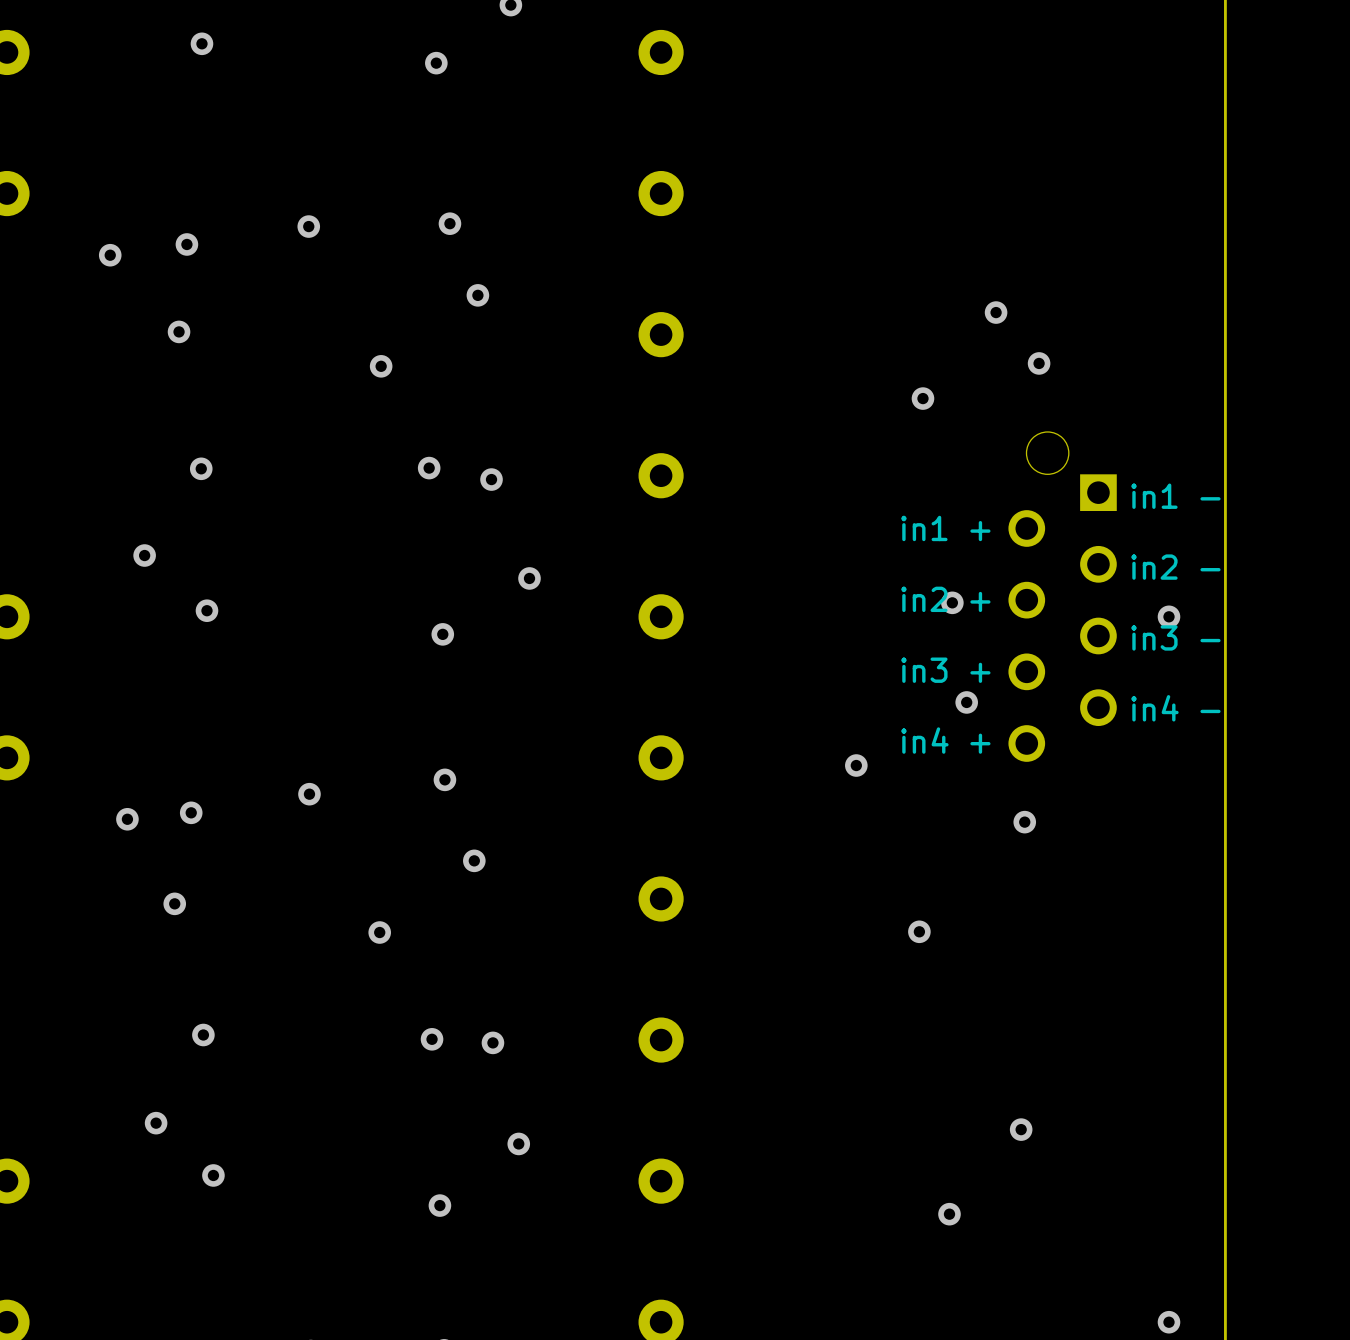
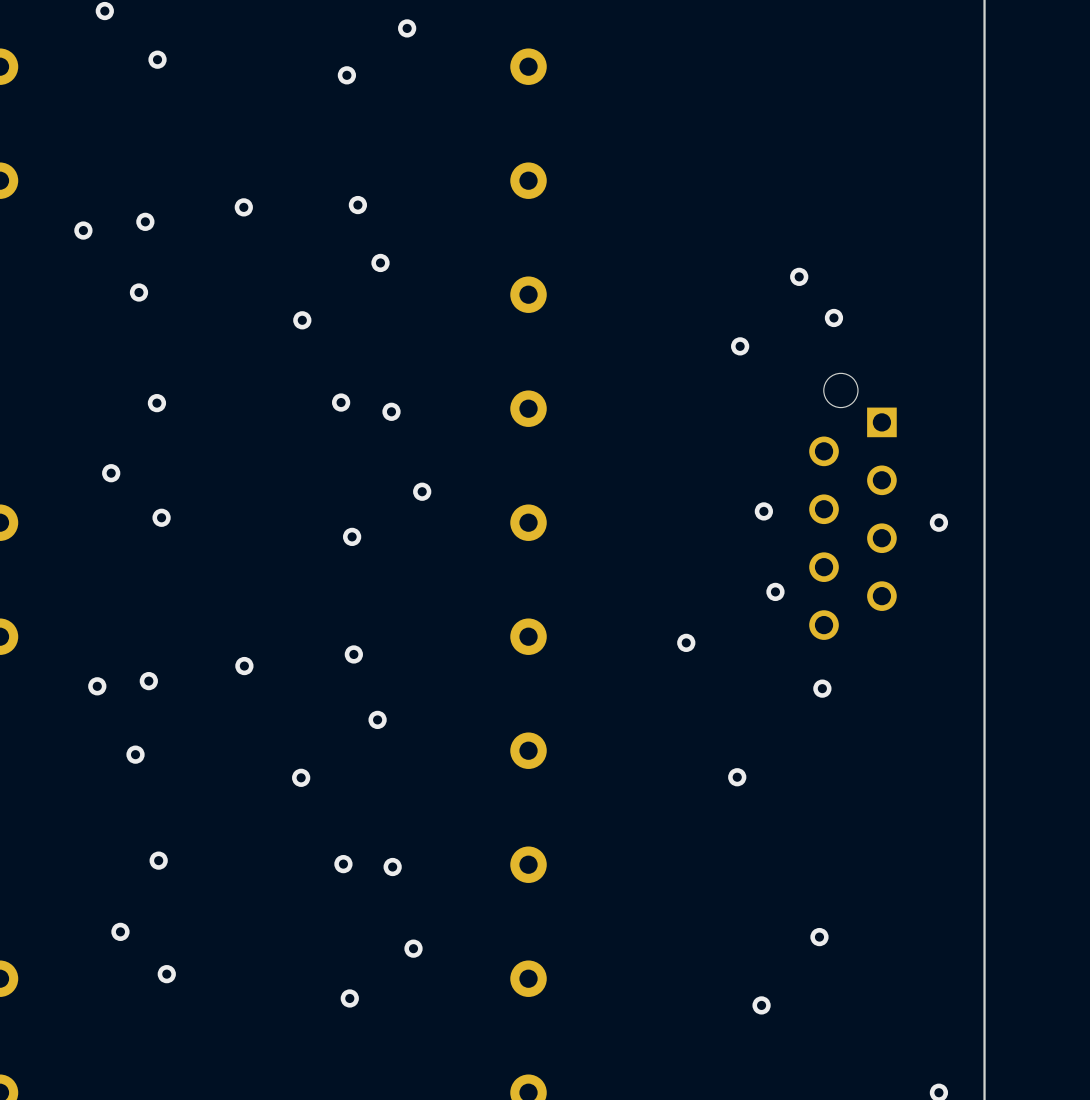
text: in1 - (1175, 496) -> none
text: in1 + (945, 528) -> none
text: in2 - (1175, 567) -> none
text: in2 + (945, 599) -> none
text: in3 - (1175, 637) -> none
text: in3 + (945, 670) -> none
text: in4 - (1175, 708) -> none
text: in4 + (945, 740) -> none

